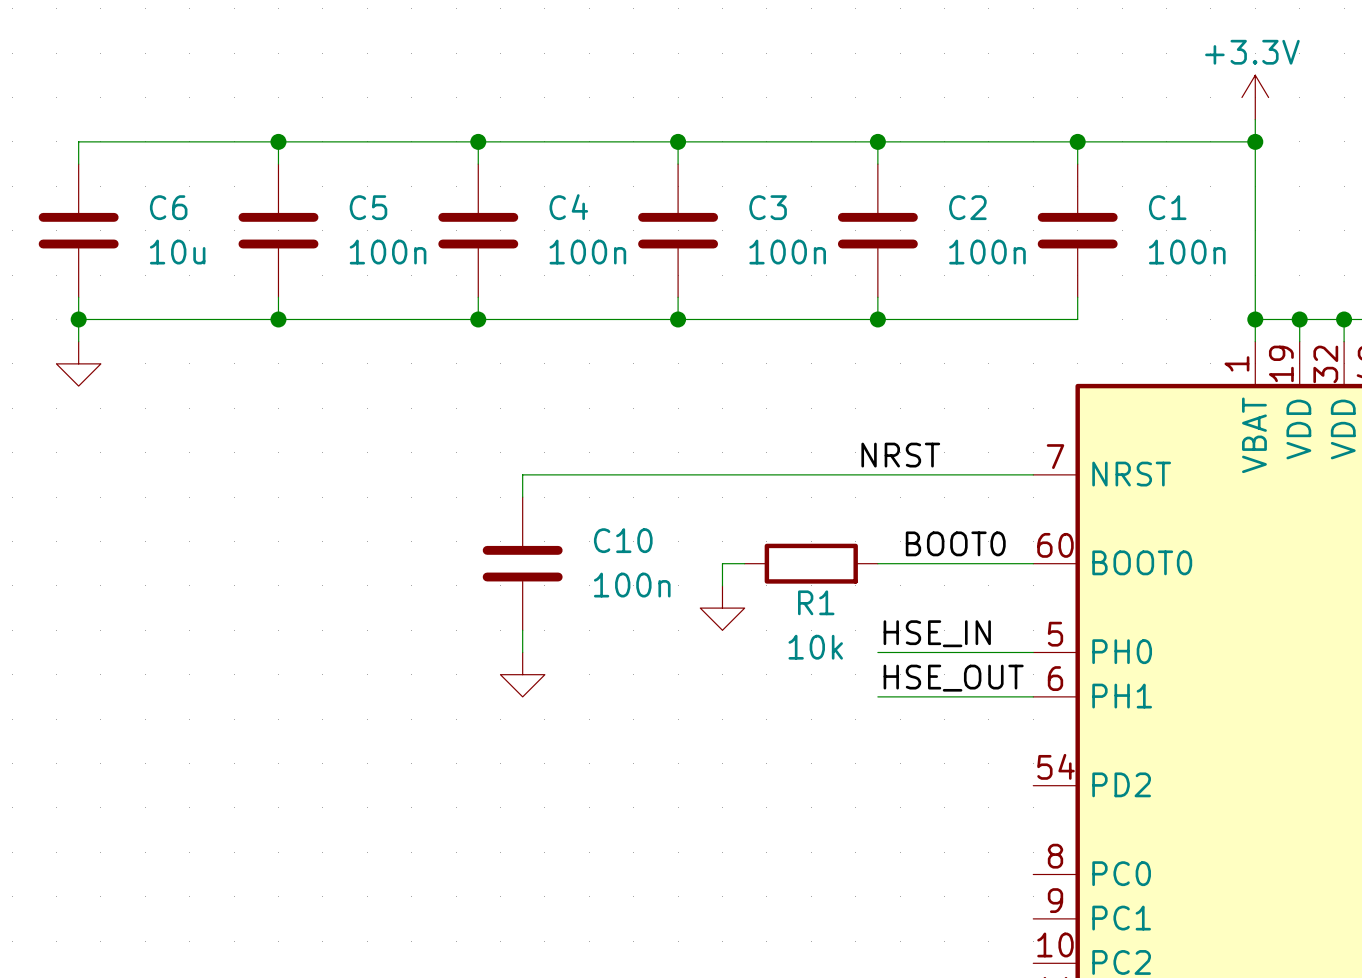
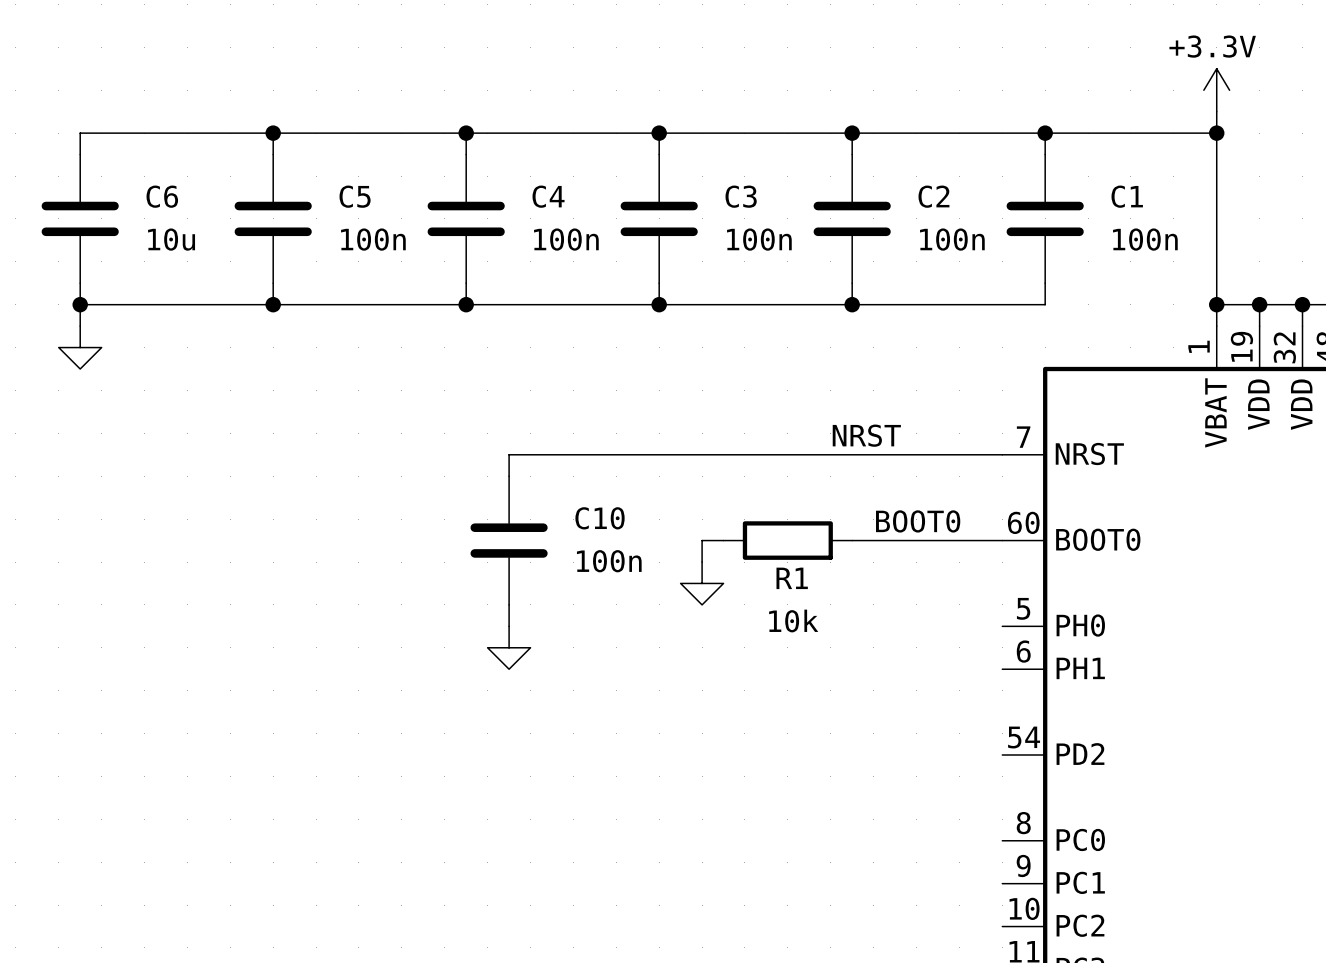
label: HSE_IN (937, 633) -> none
wire: (877, 652) (1033, 652) -> none
label: HSE_OUT (953, 678) -> none
wire: (877, 696) (1033, 696) -> none

